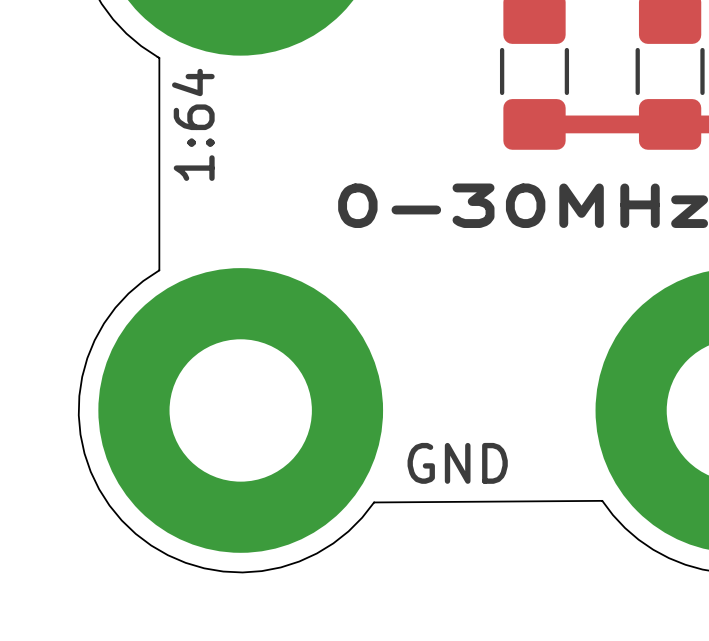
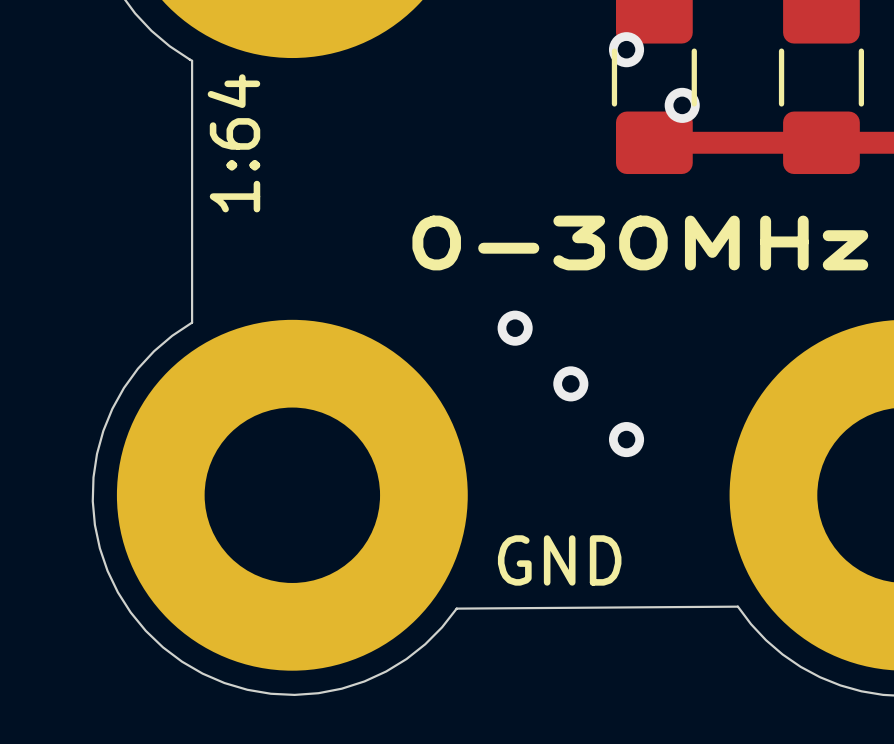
via: none -> (626, 49)
via: none -> (682, 105)
via: none -> (515, 328)
via: none -> (570, 383)
via: none -> (626, 439)

